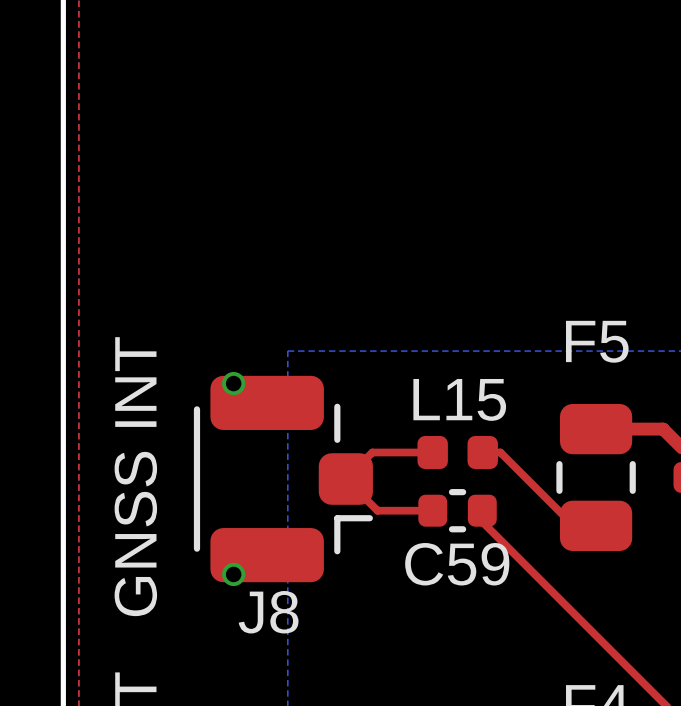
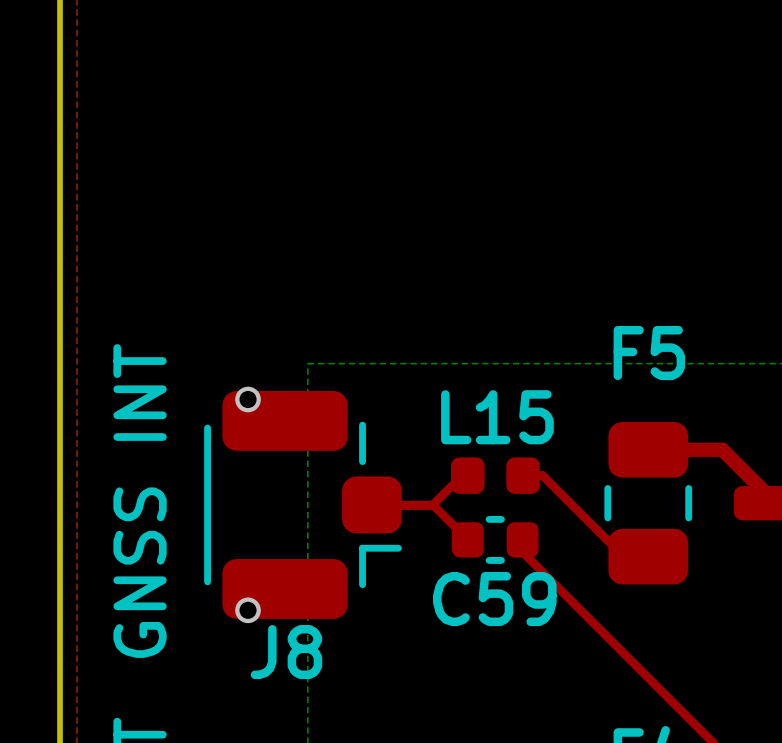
top track: (427, 452) (372, 452) (345, 479) (377, 510) (432, 510) -> (462, 475) (432, 505)
top track: none -> (372, 505) (433, 505) (467, 539)

